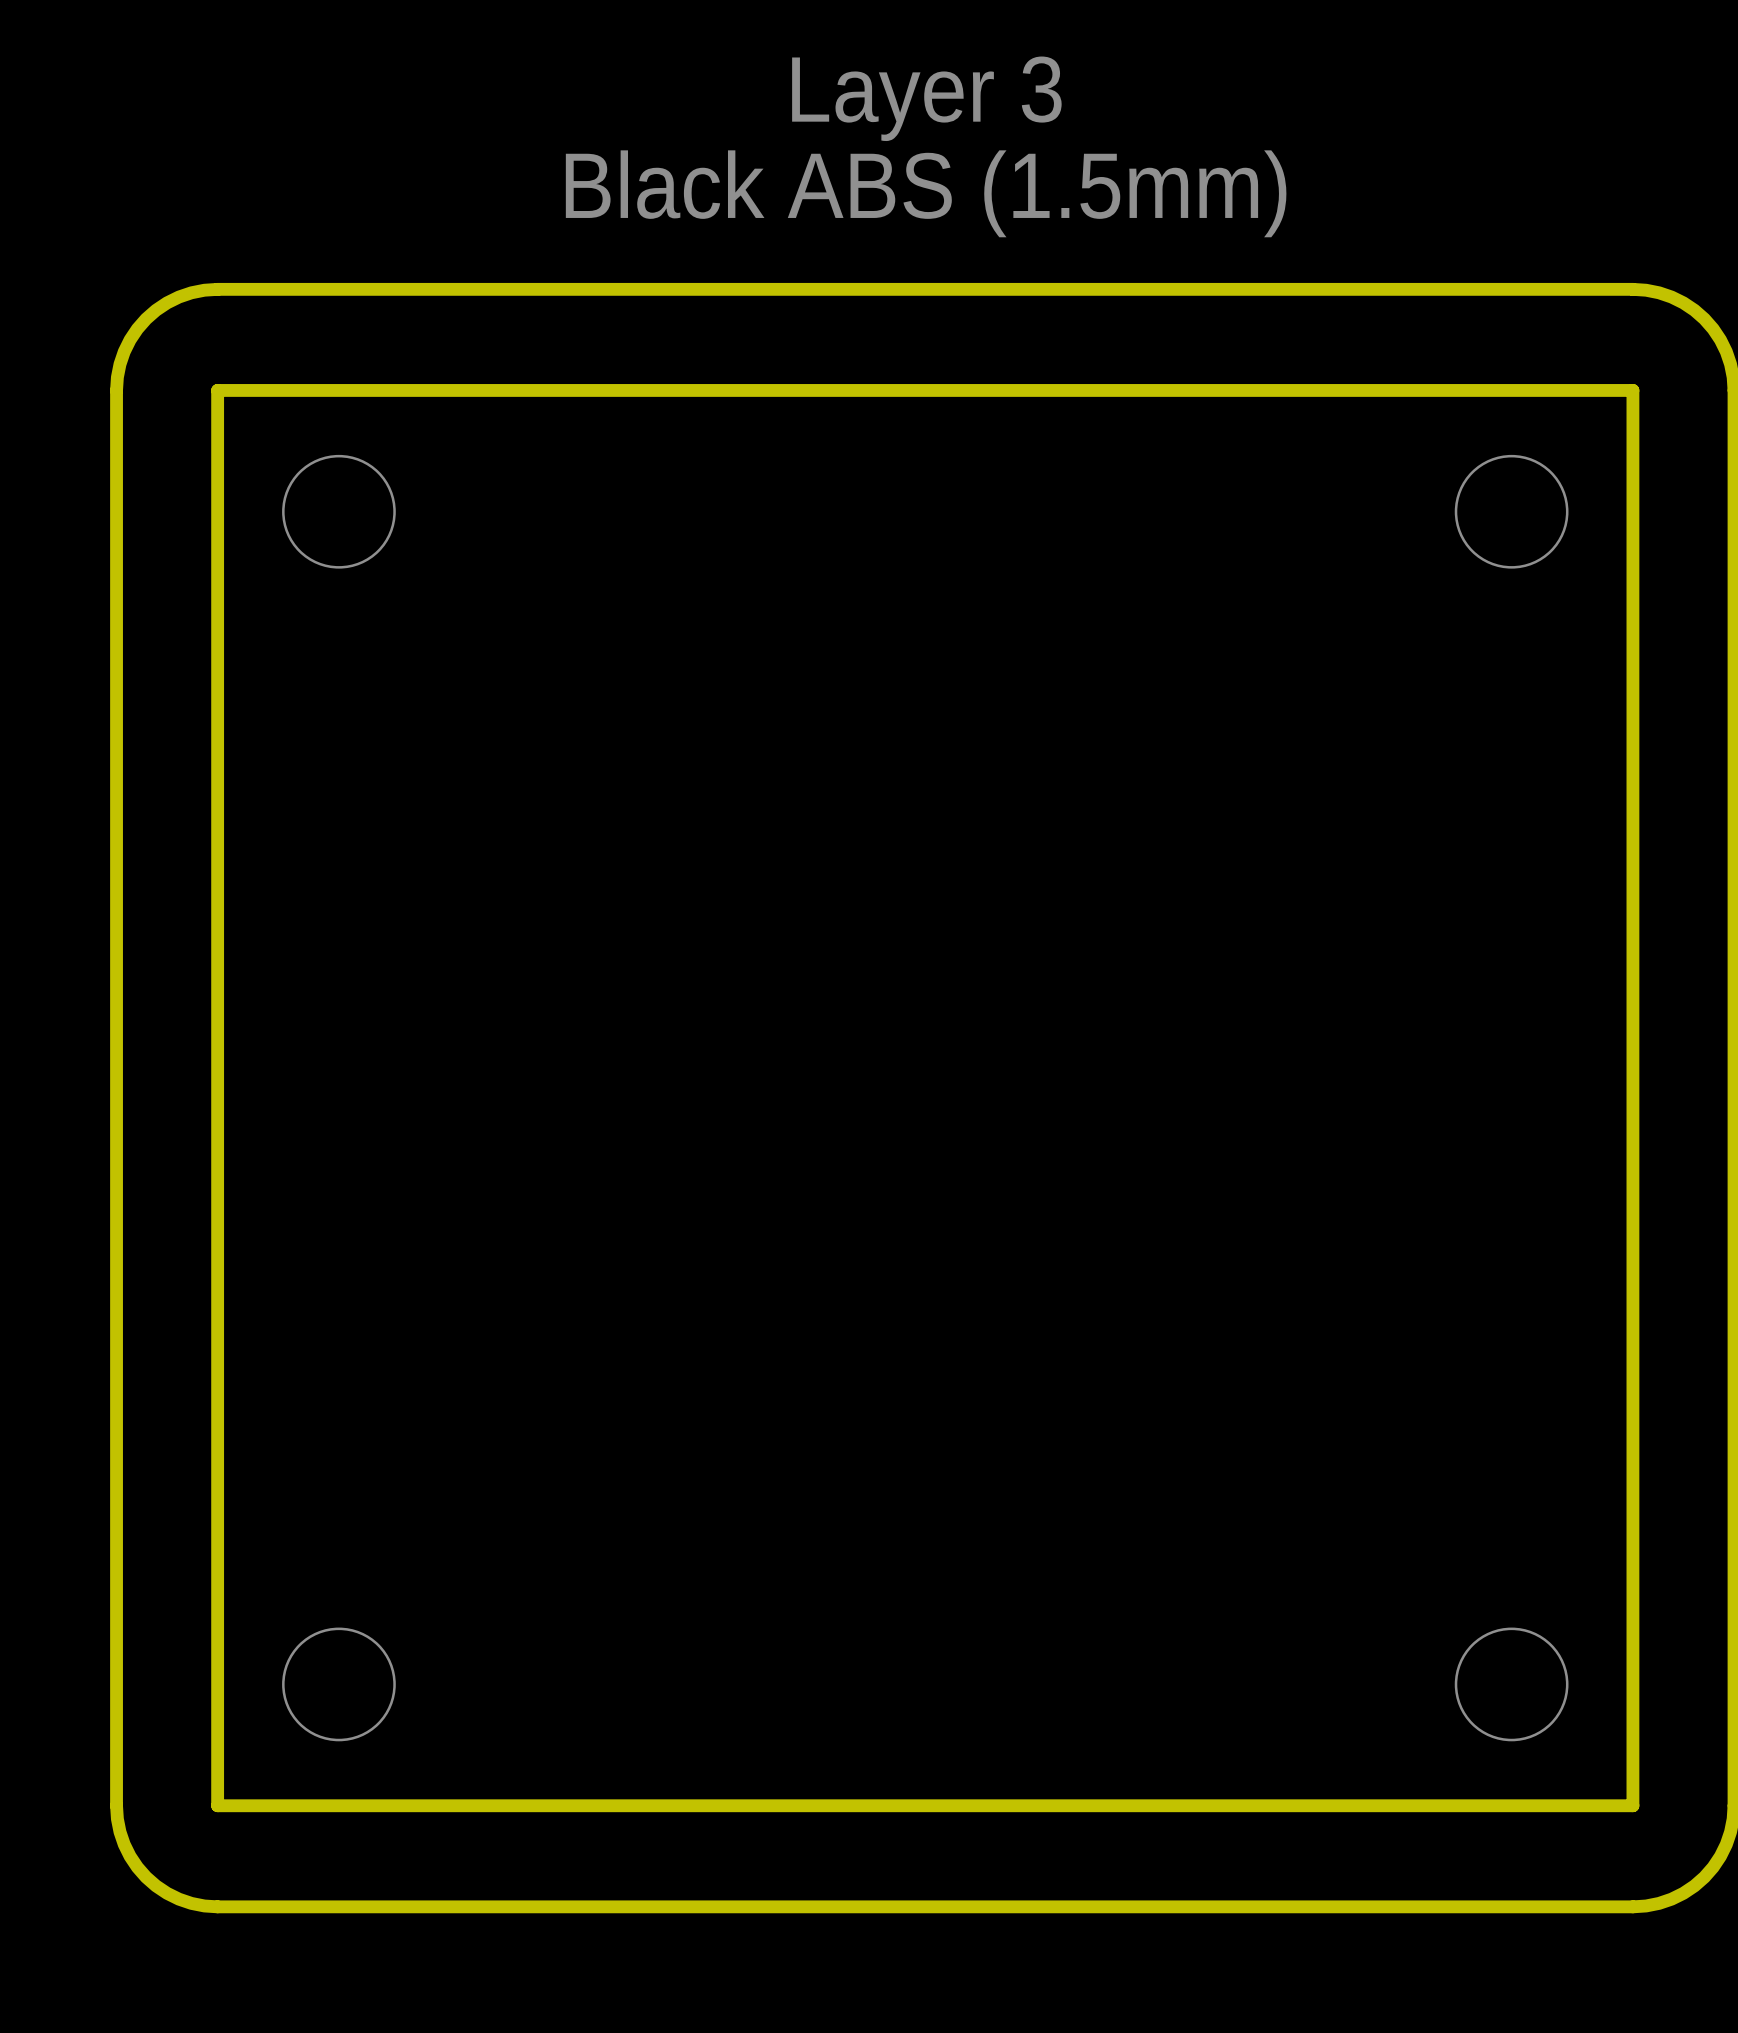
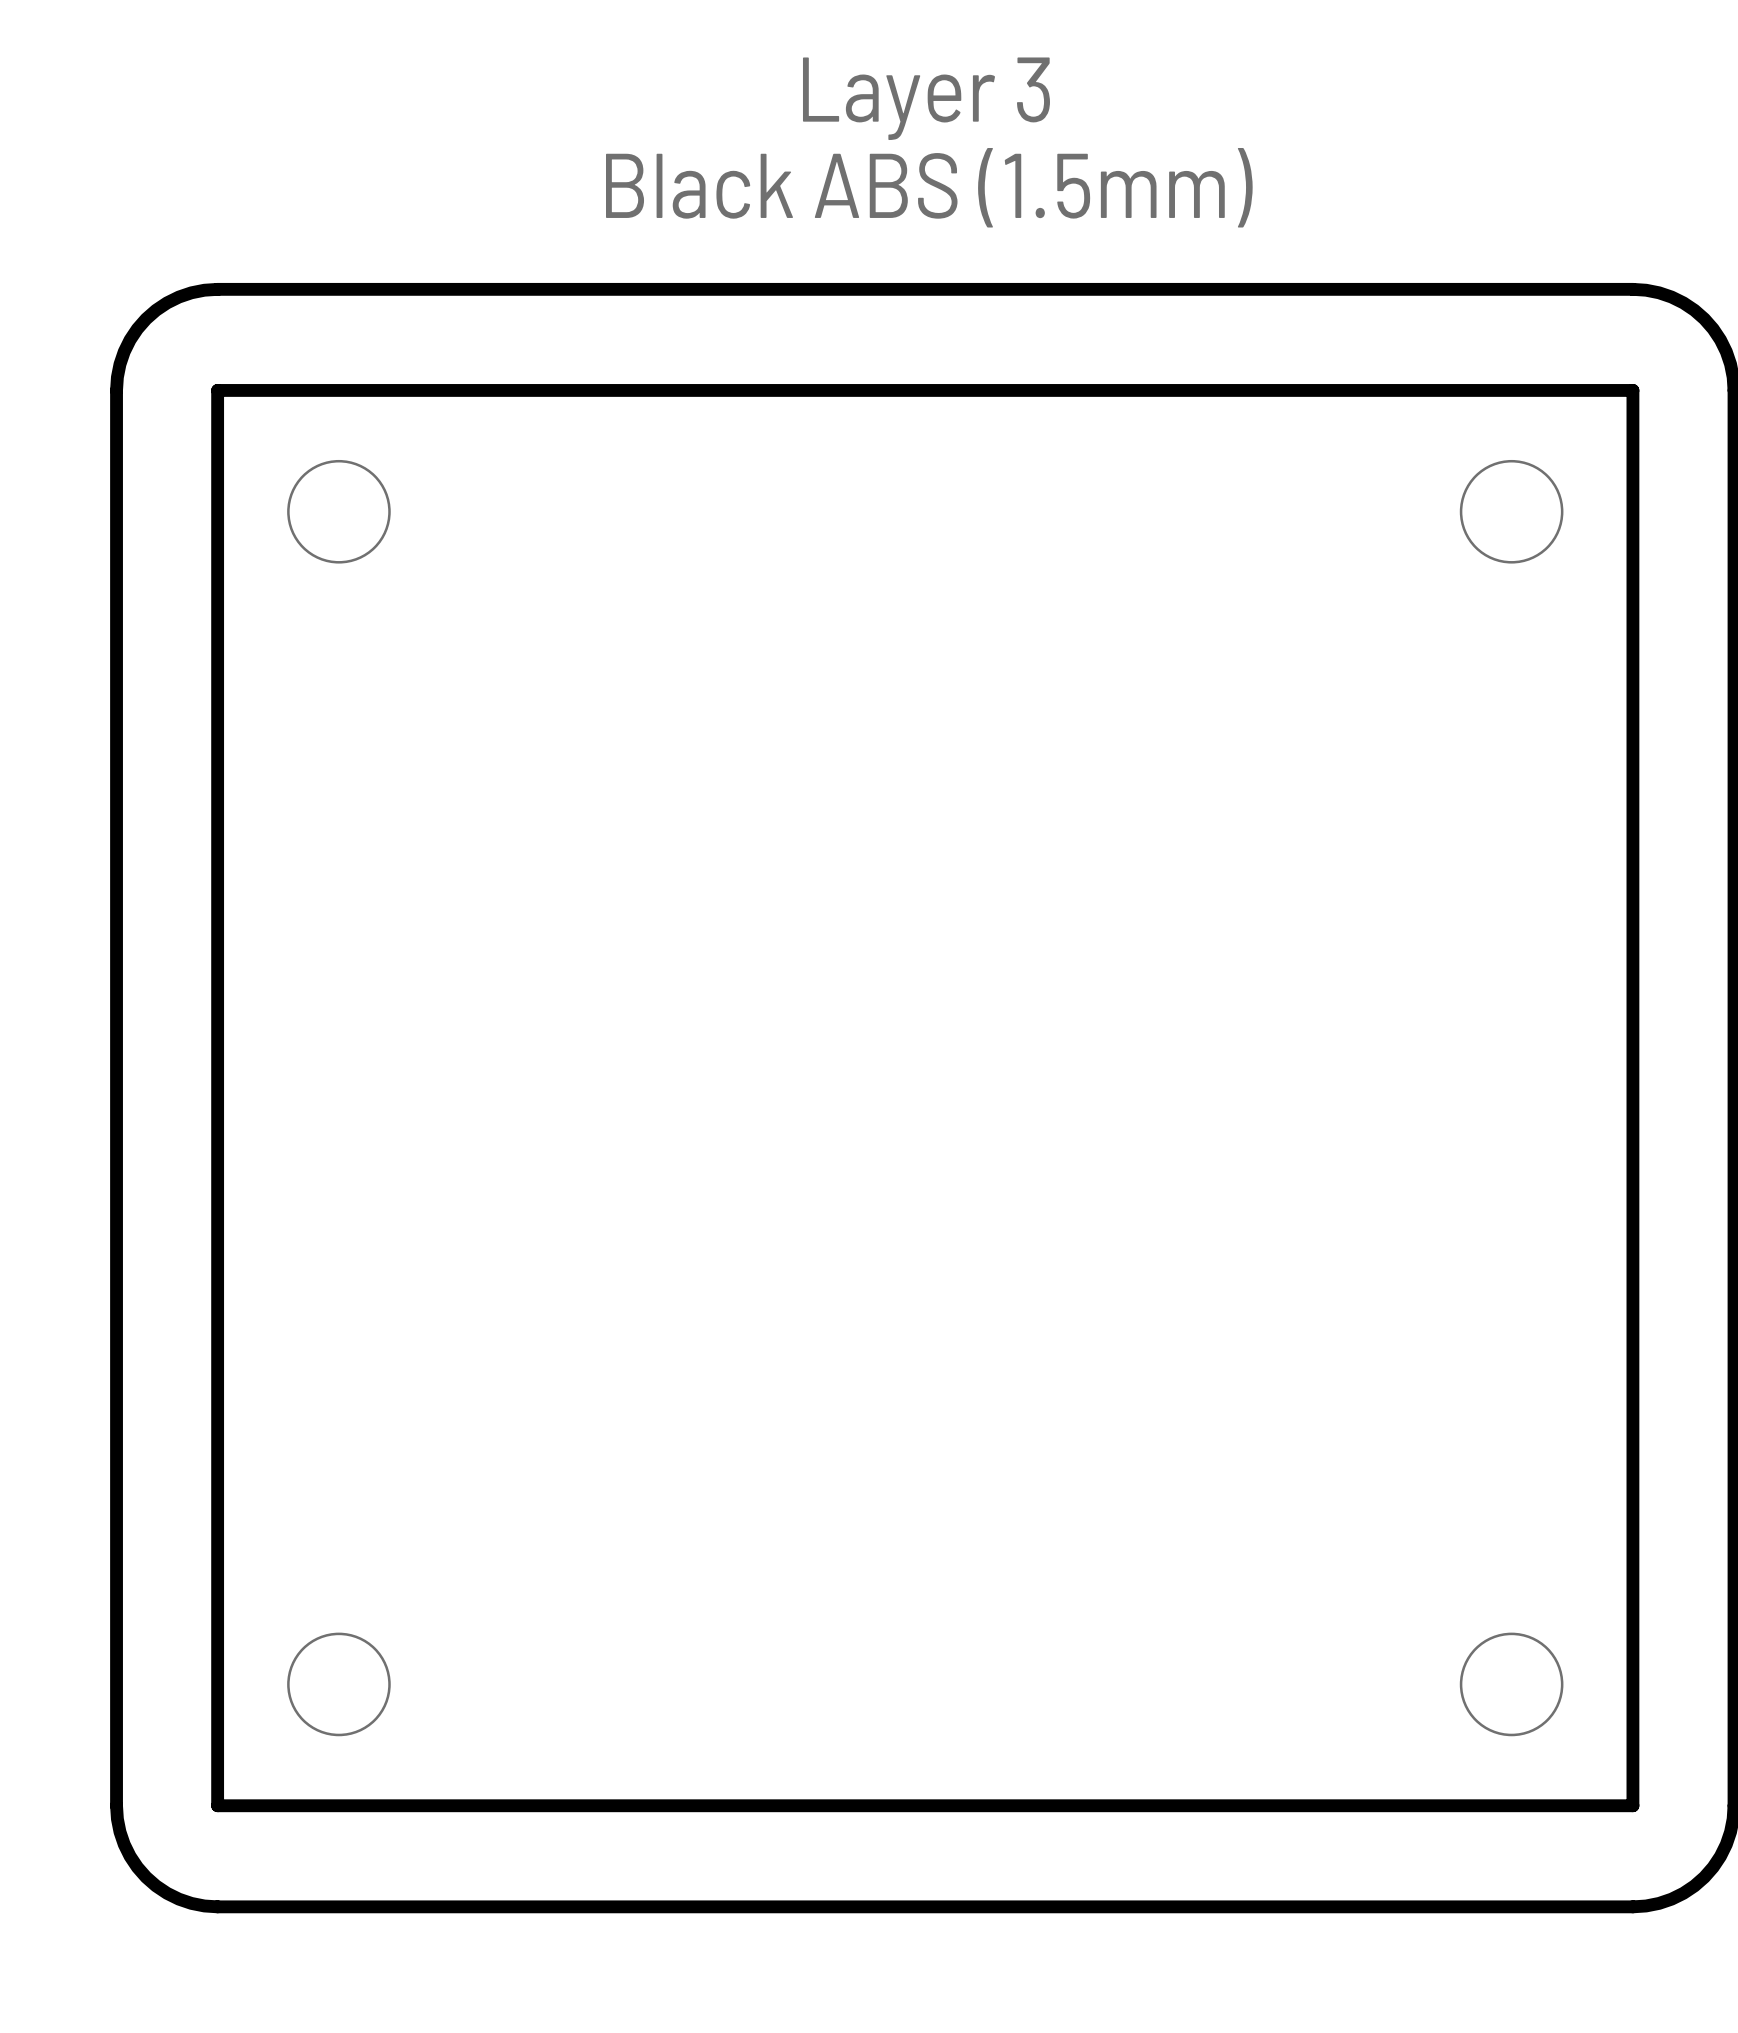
drawing shape: [282, 454, 396, 569] -> [287, 459, 391, 564]
drawing shape: [1454, 454, 1569, 569] -> [1459, 459, 1564, 564]
drawing shape: [282, 1627, 396, 1742] -> [287, 1632, 391, 1737]
drawing shape: [1454, 1627, 1569, 1742] -> [1459, 1632, 1564, 1737]

